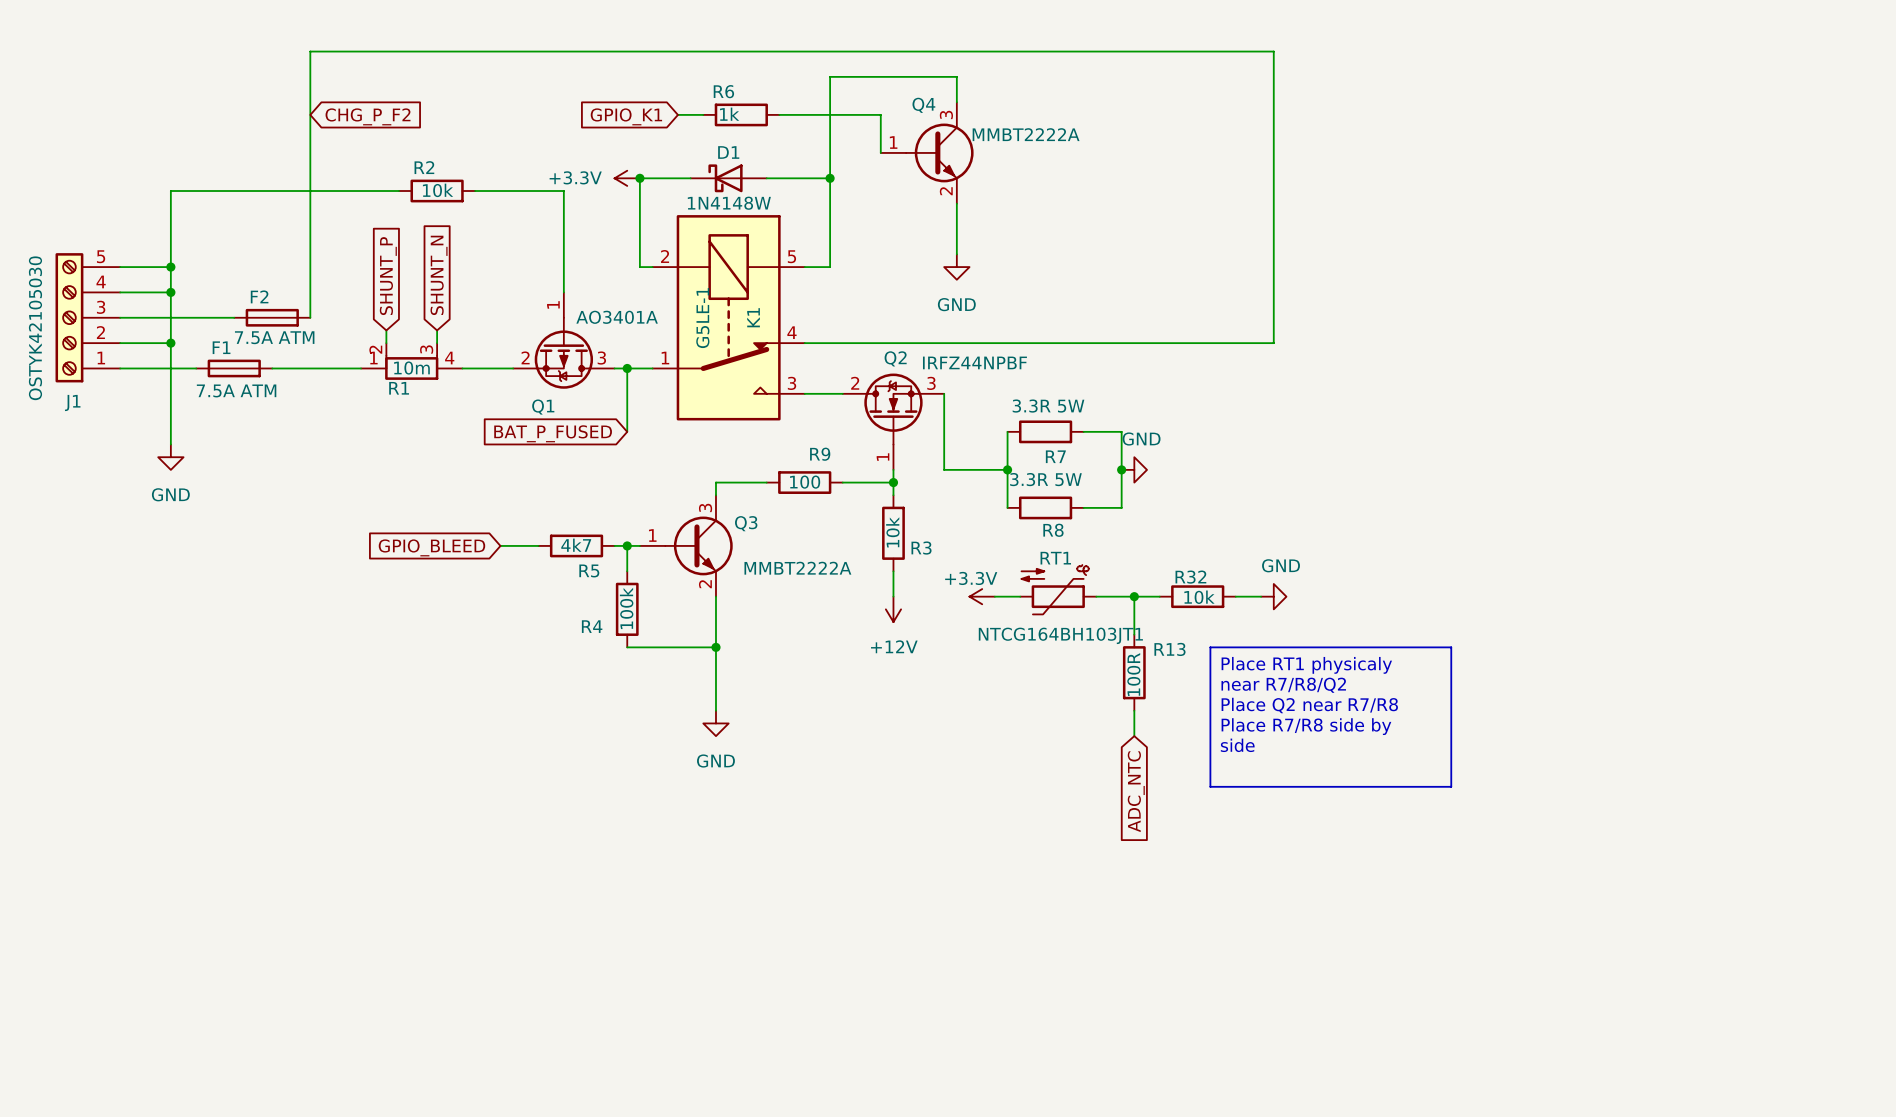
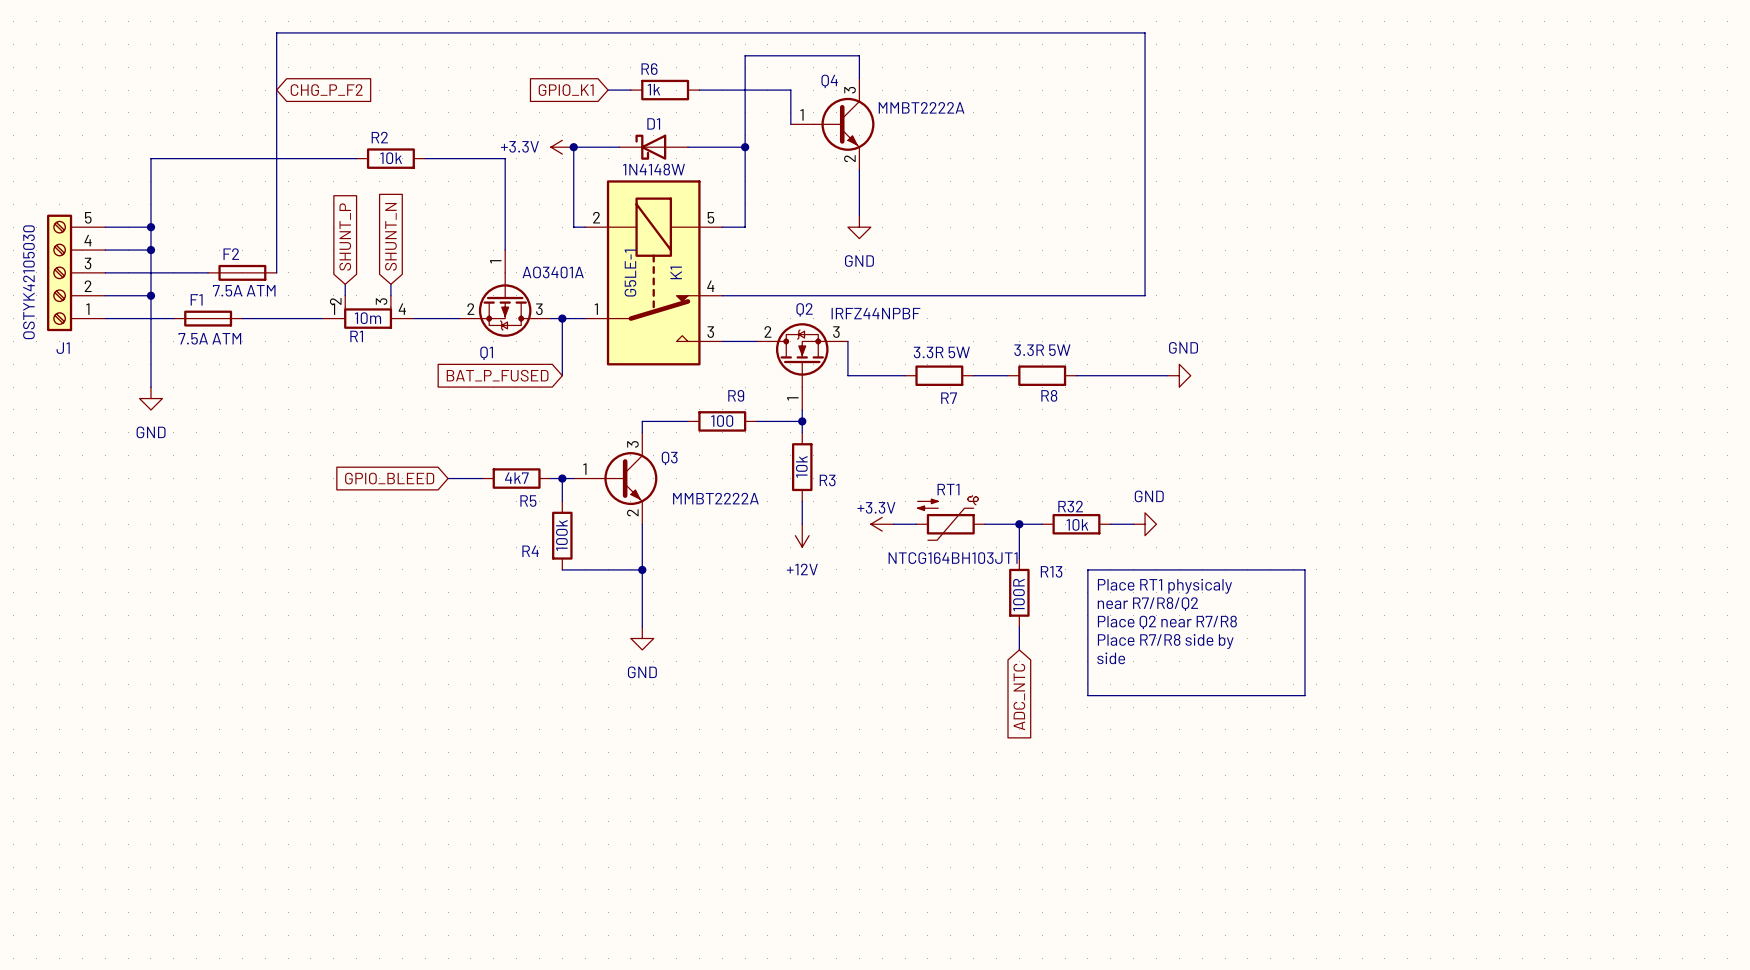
wire: (944, 431) (944, 469) (1007, 469) -> (847, 375) (905, 375)
wire: (1007, 431) (1007, 507) -> none
wire: (1121, 431) (1121, 507) (1083, 507) -> none
wire: none -> (1076, 375) (1167, 375)
junction: (1007, 469) -> none
junction: (1121, 469) -> none
power symbol position: GND (1134, 469) -> GND (1179, 375)
R8 position: (1045, 507) -> (1042, 375)

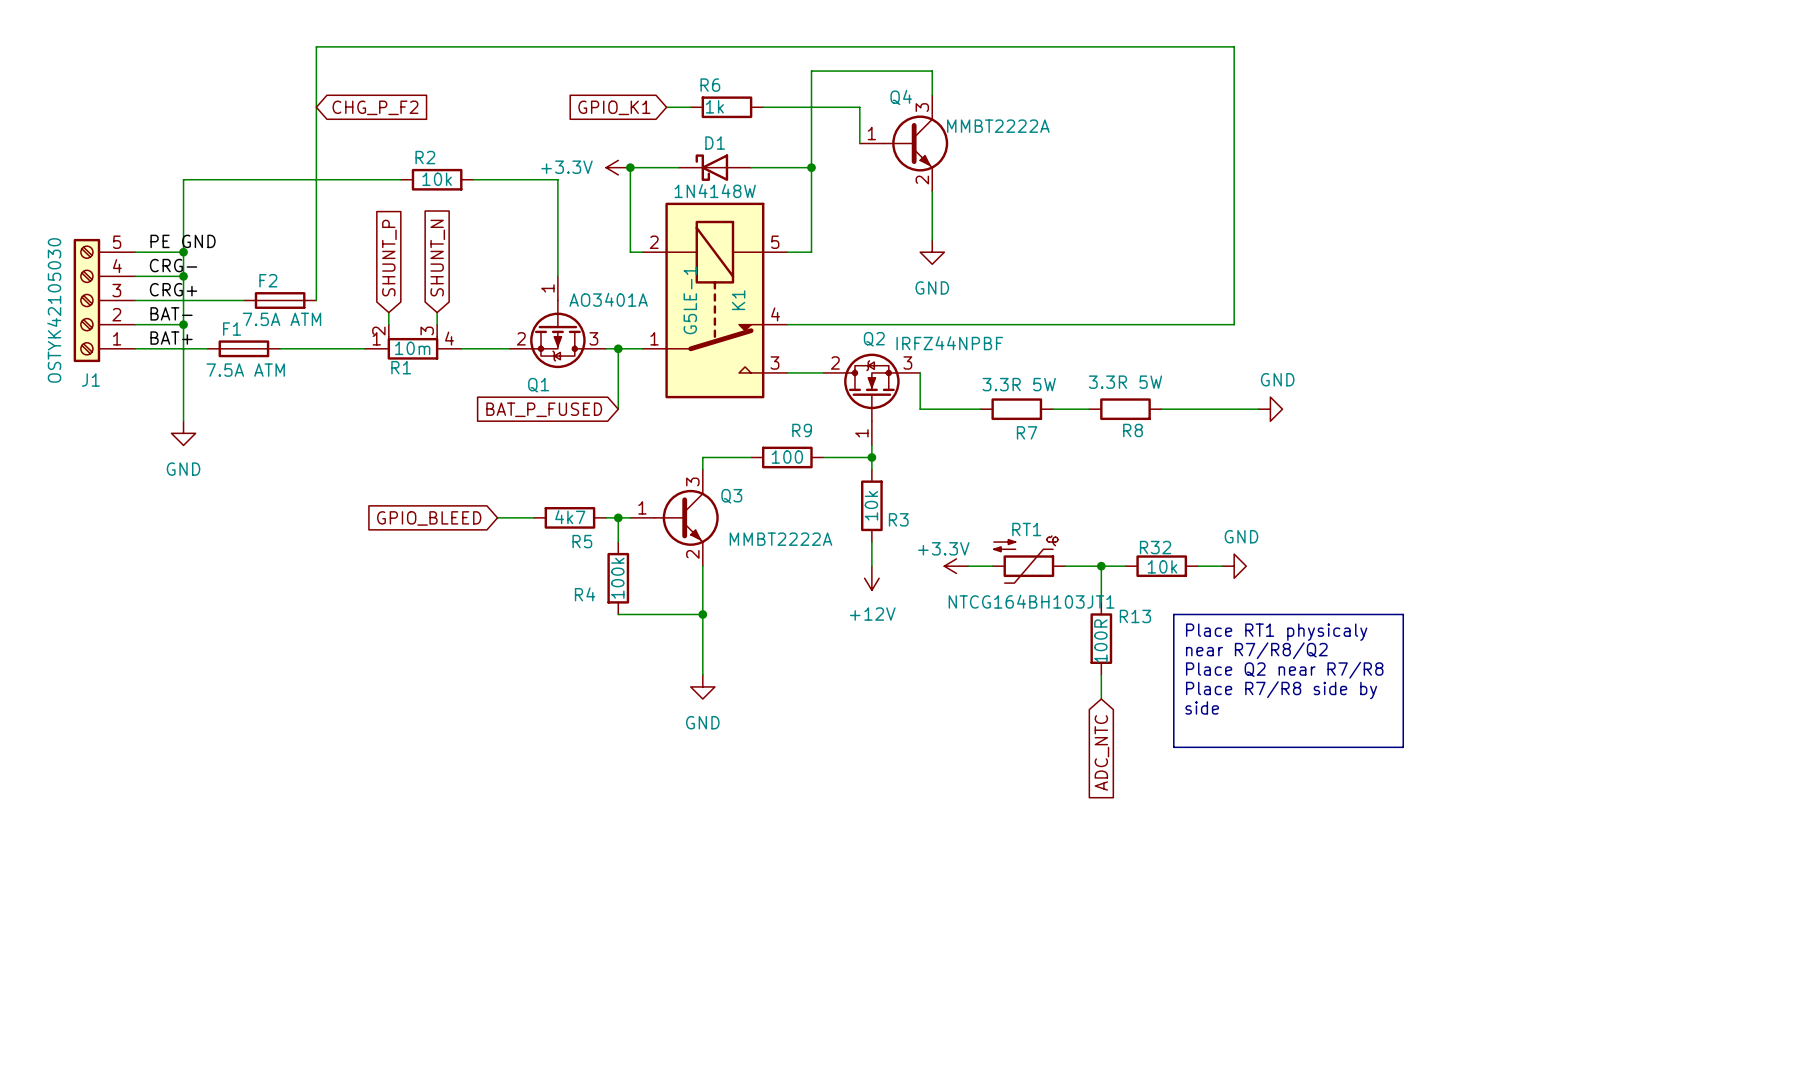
label: none -> PE GND (183, 241)
label: none -> CRG- (173, 265)
label: none -> CRG+ (173, 289)
label: none -> BAT- (171, 313)
label: none -> BAT+ (171, 338)

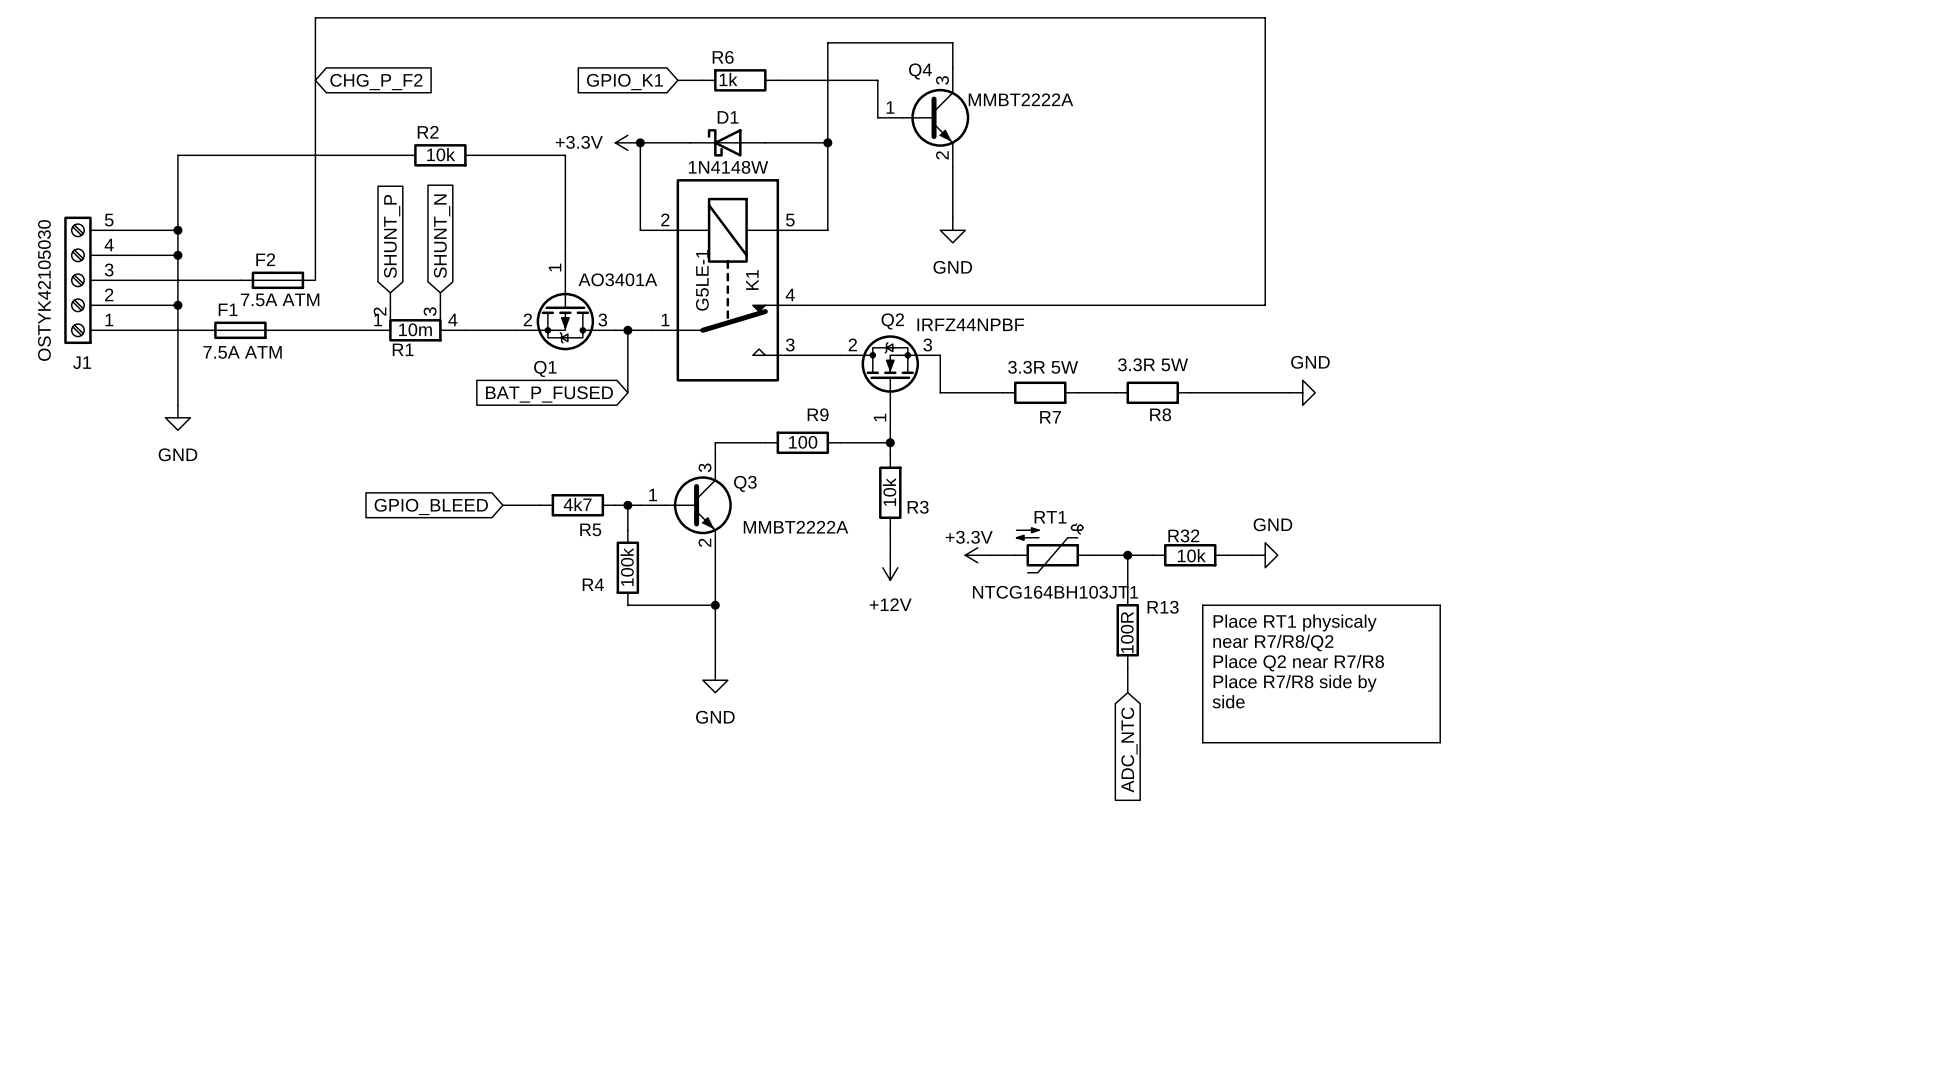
label: PE GND (183, 241) -> none
label: CRG- (173, 265) -> none
label: CRG+ (173, 289) -> none
label: BAT- (171, 313) -> none
label: BAT+ (171, 338) -> none

